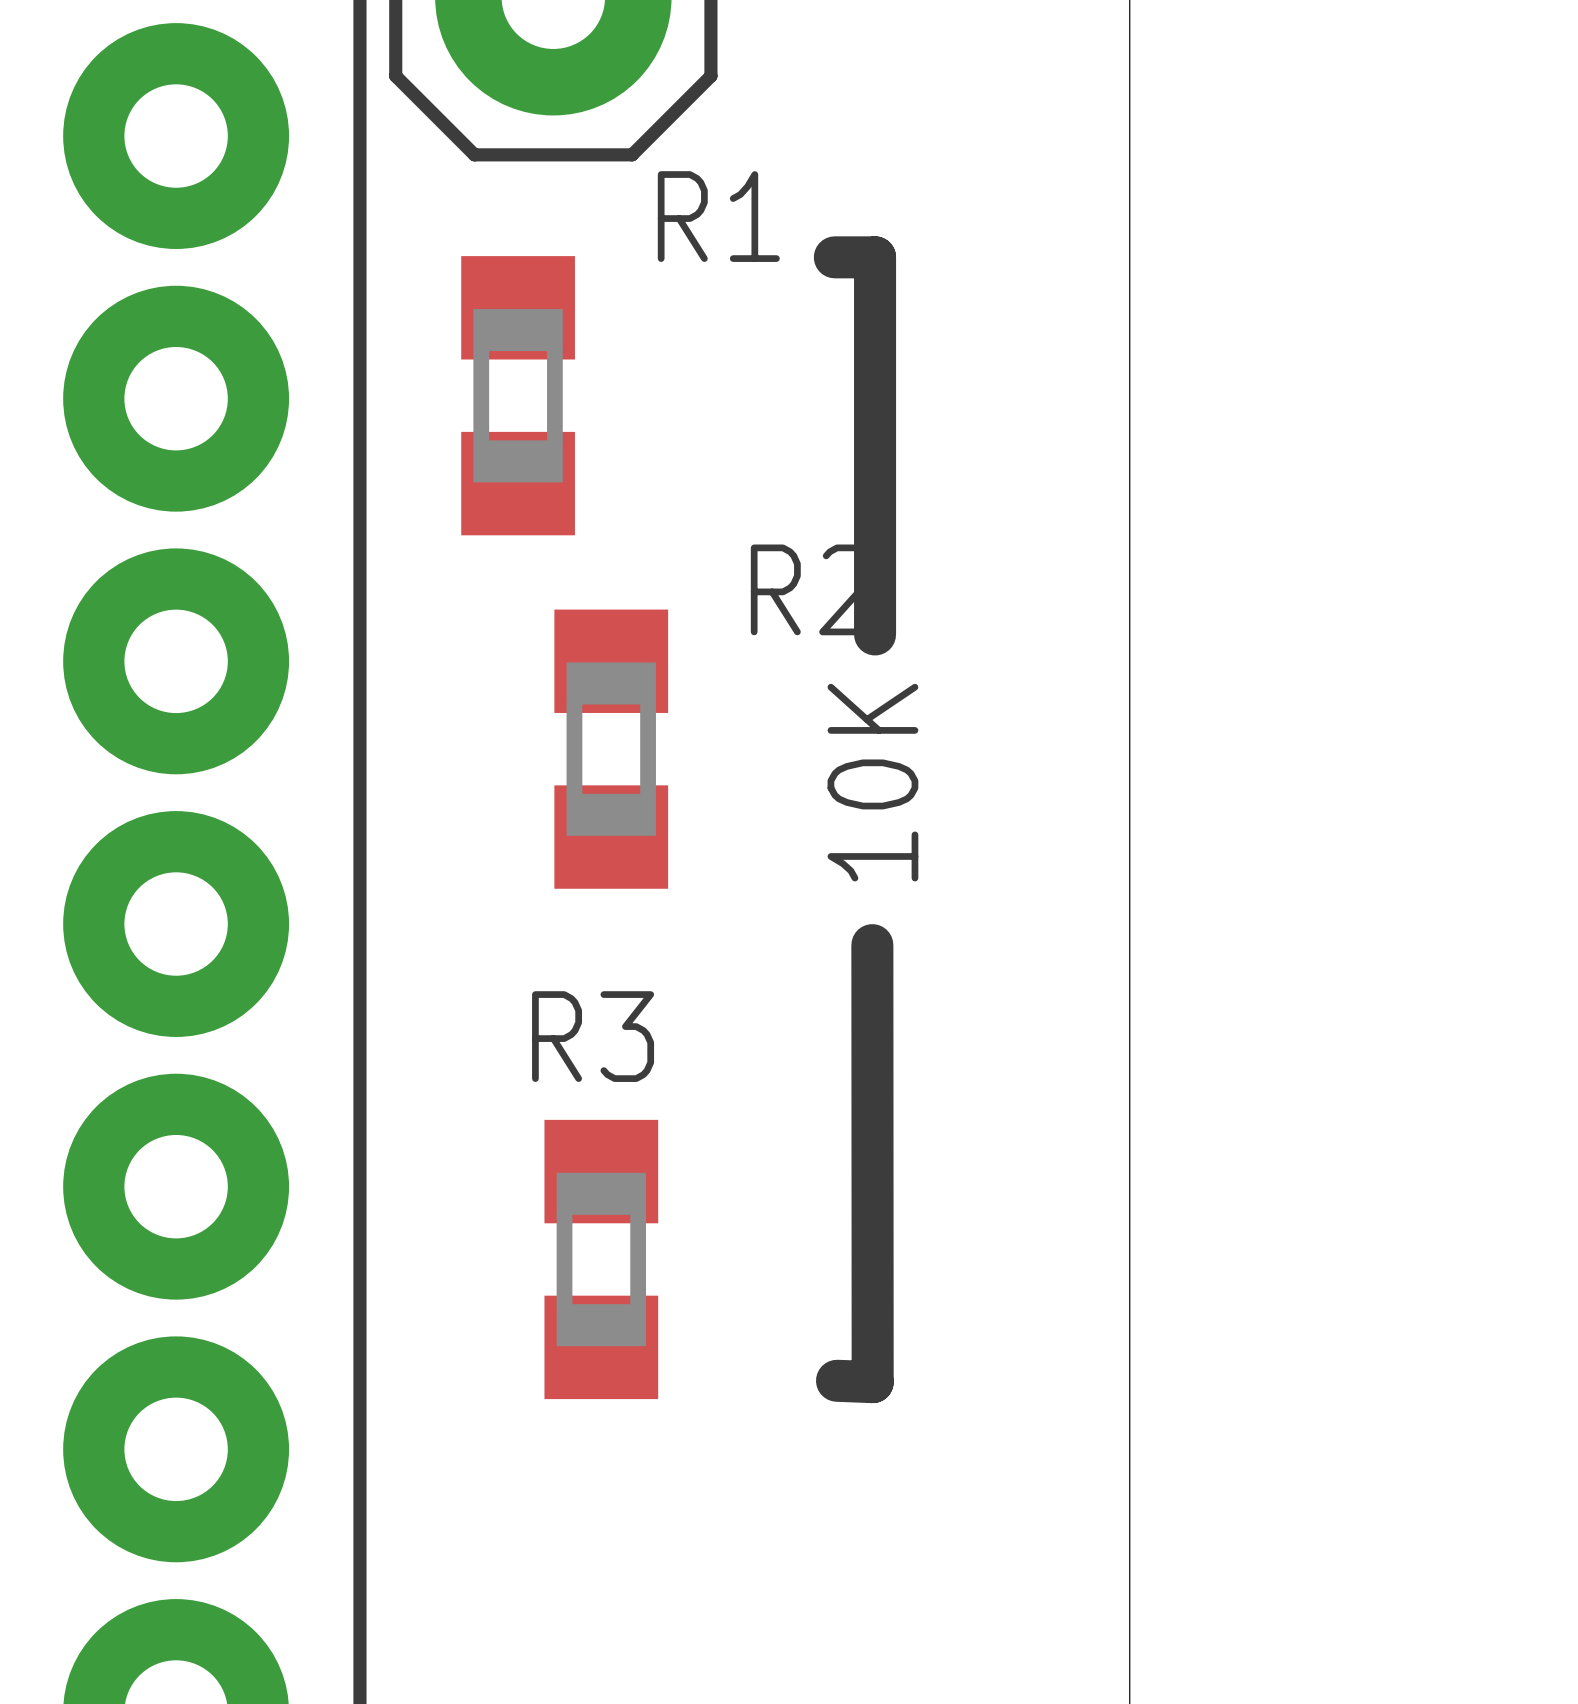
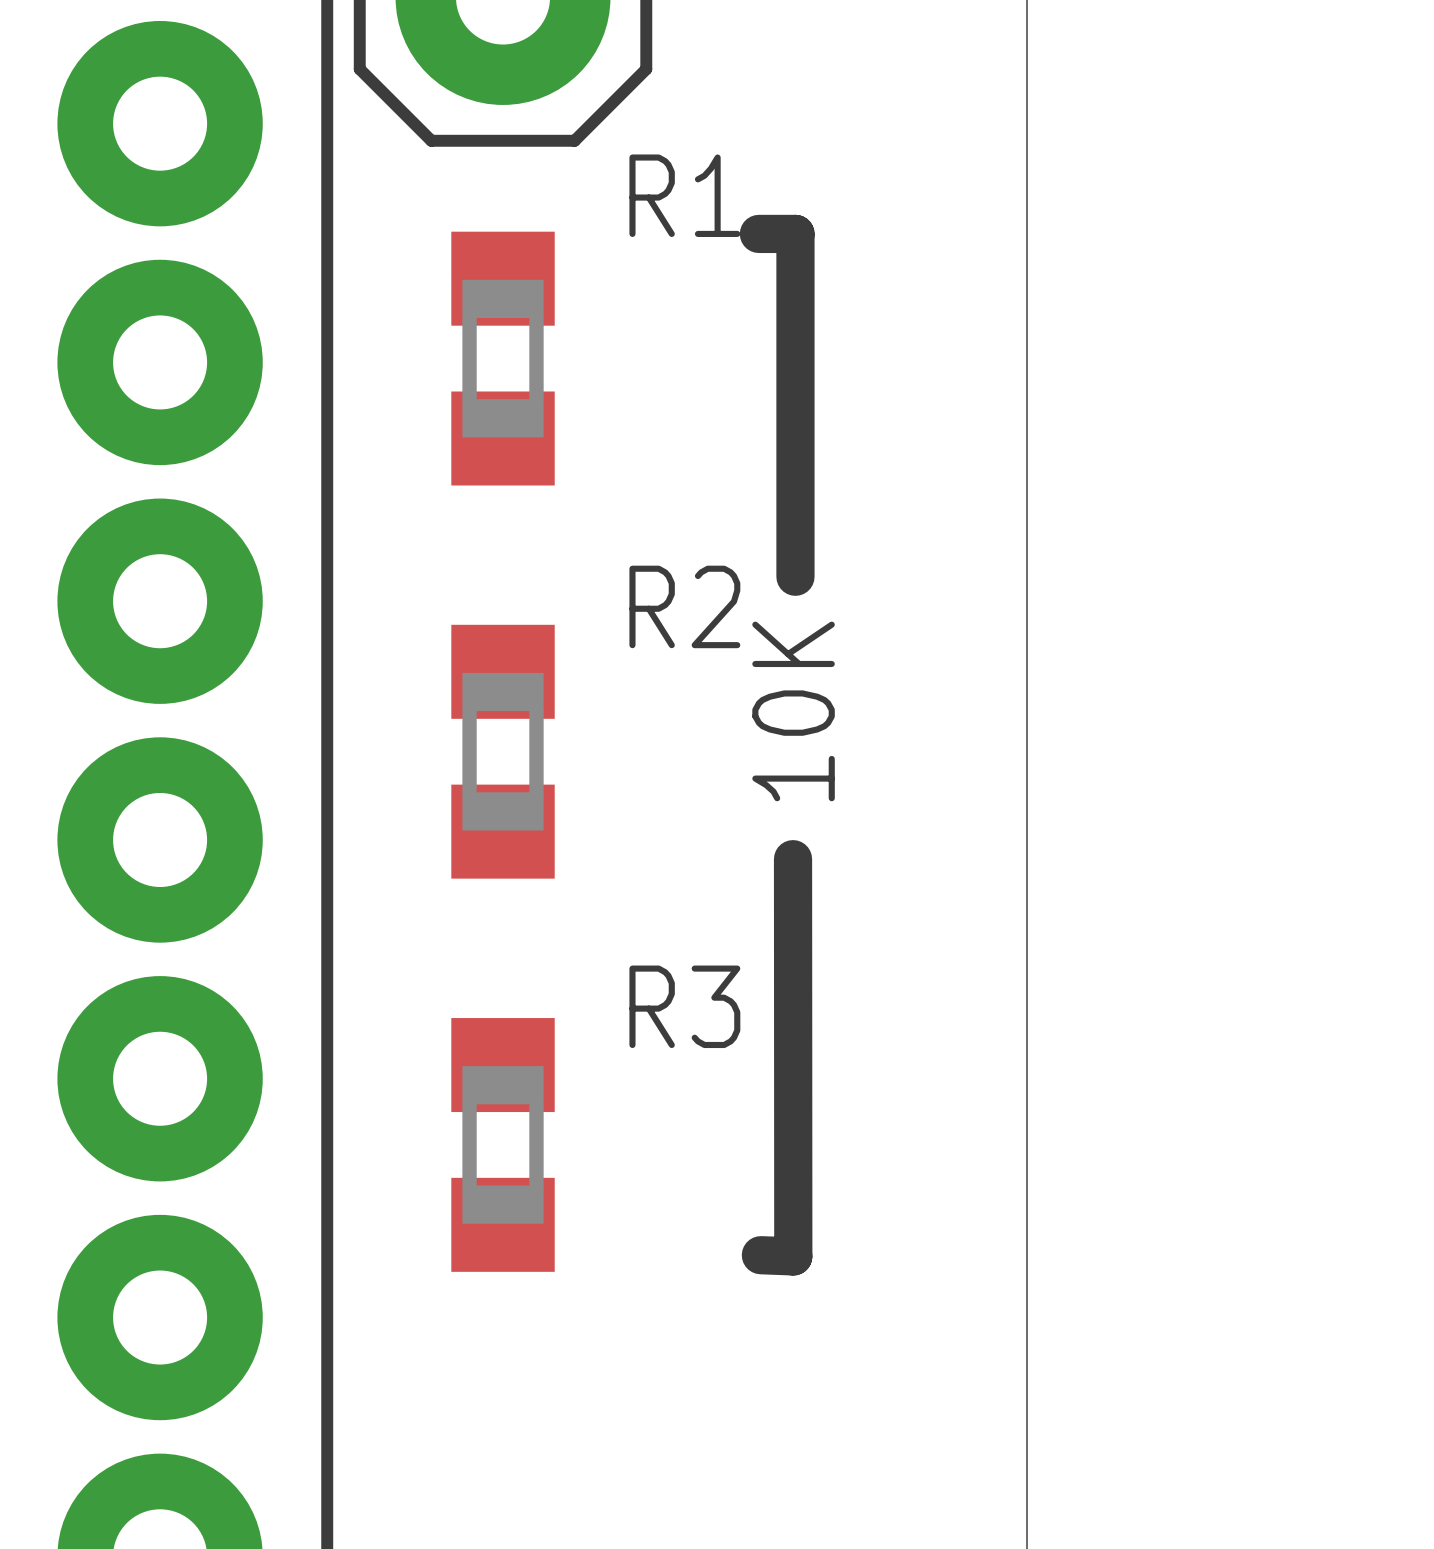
R1 position: (518, 395) -> (503, 358)
R2 position: (611, 749) -> (503, 751)
R3 name position: R3 (593, 1036) -> R3 (684, 1006)
R3 position: (601, 1259) -> (503, 1144)

